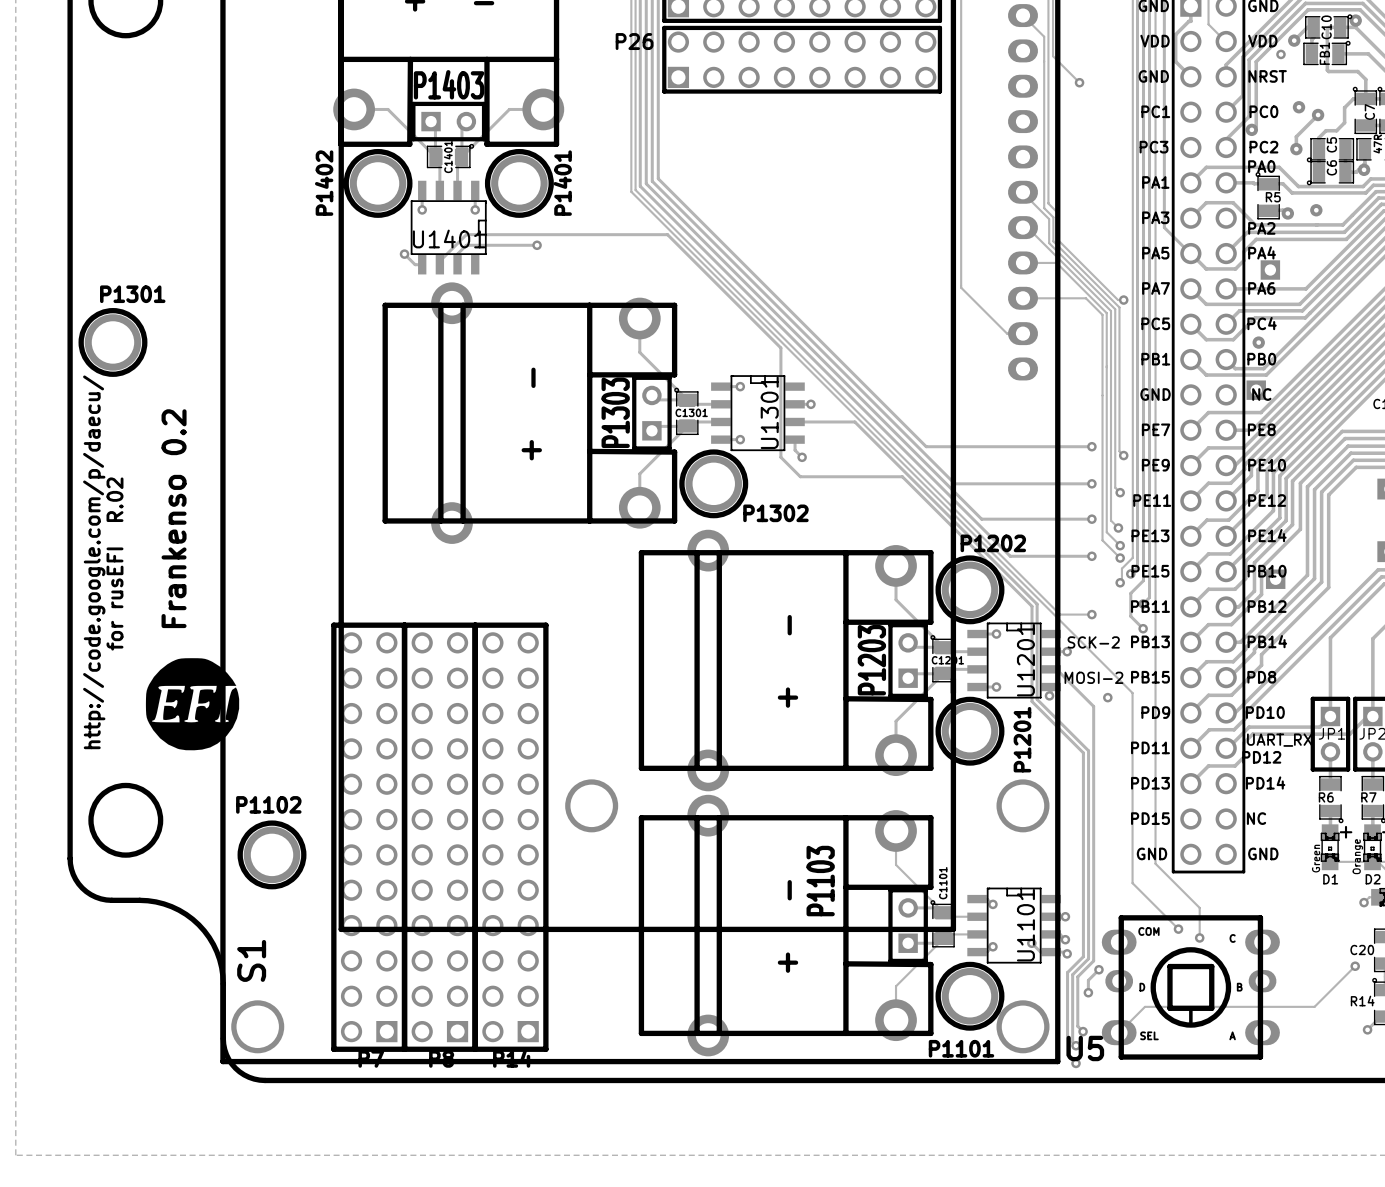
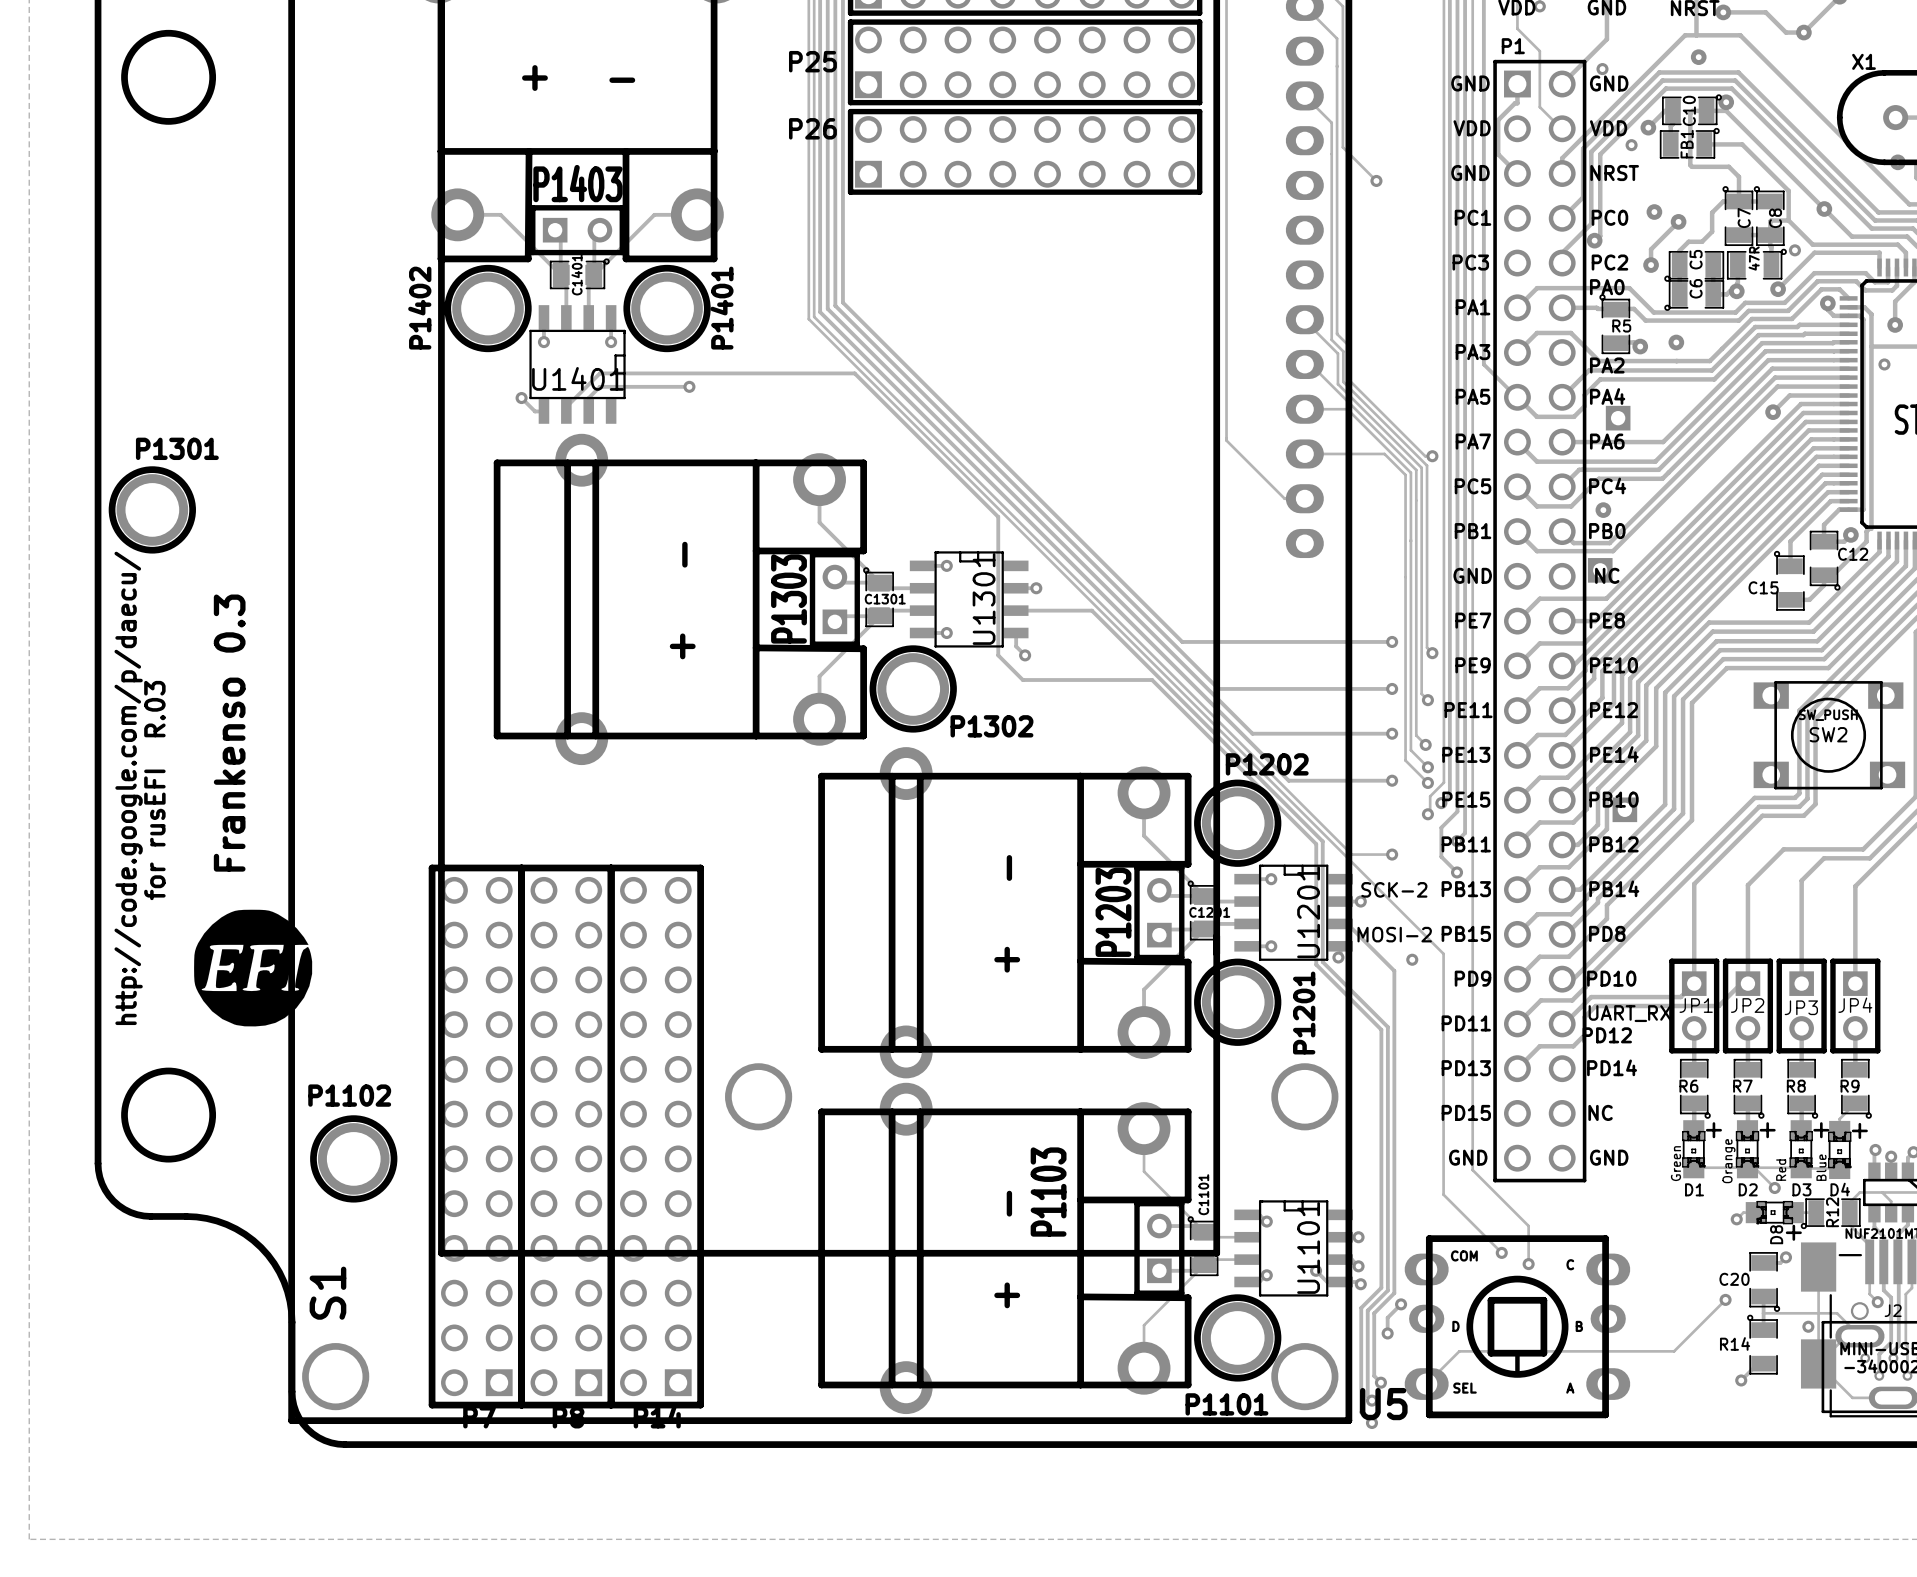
text: Frankenso 0.2 (174, 518) -> Frankenso 0.3 (229, 733)
text: for rusEFI R.02 (114, 564) -> for rusEFI R.03 (154, 790)

